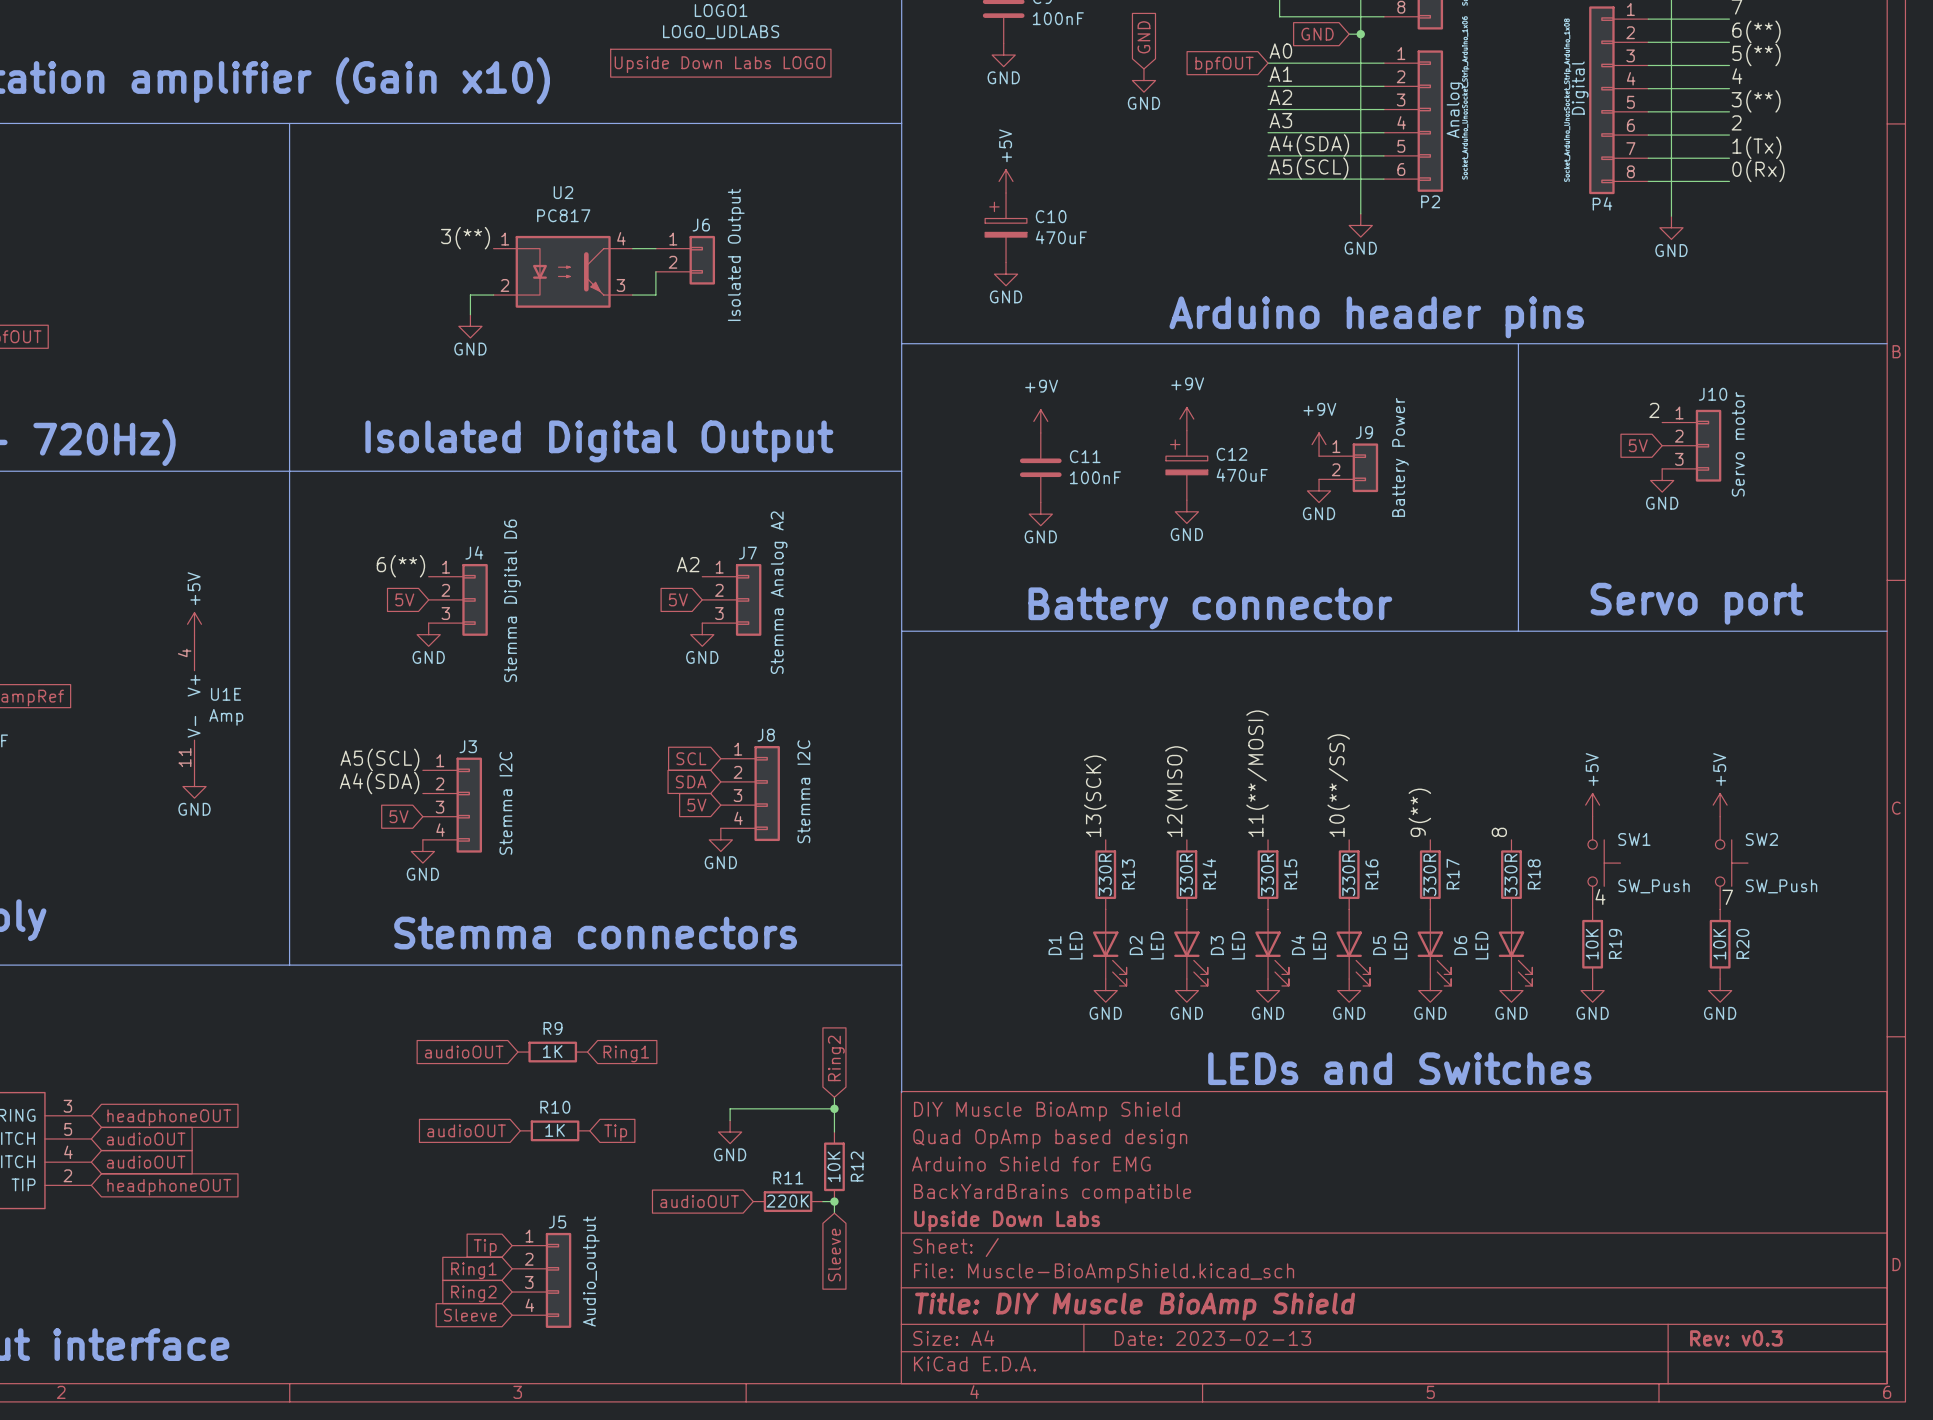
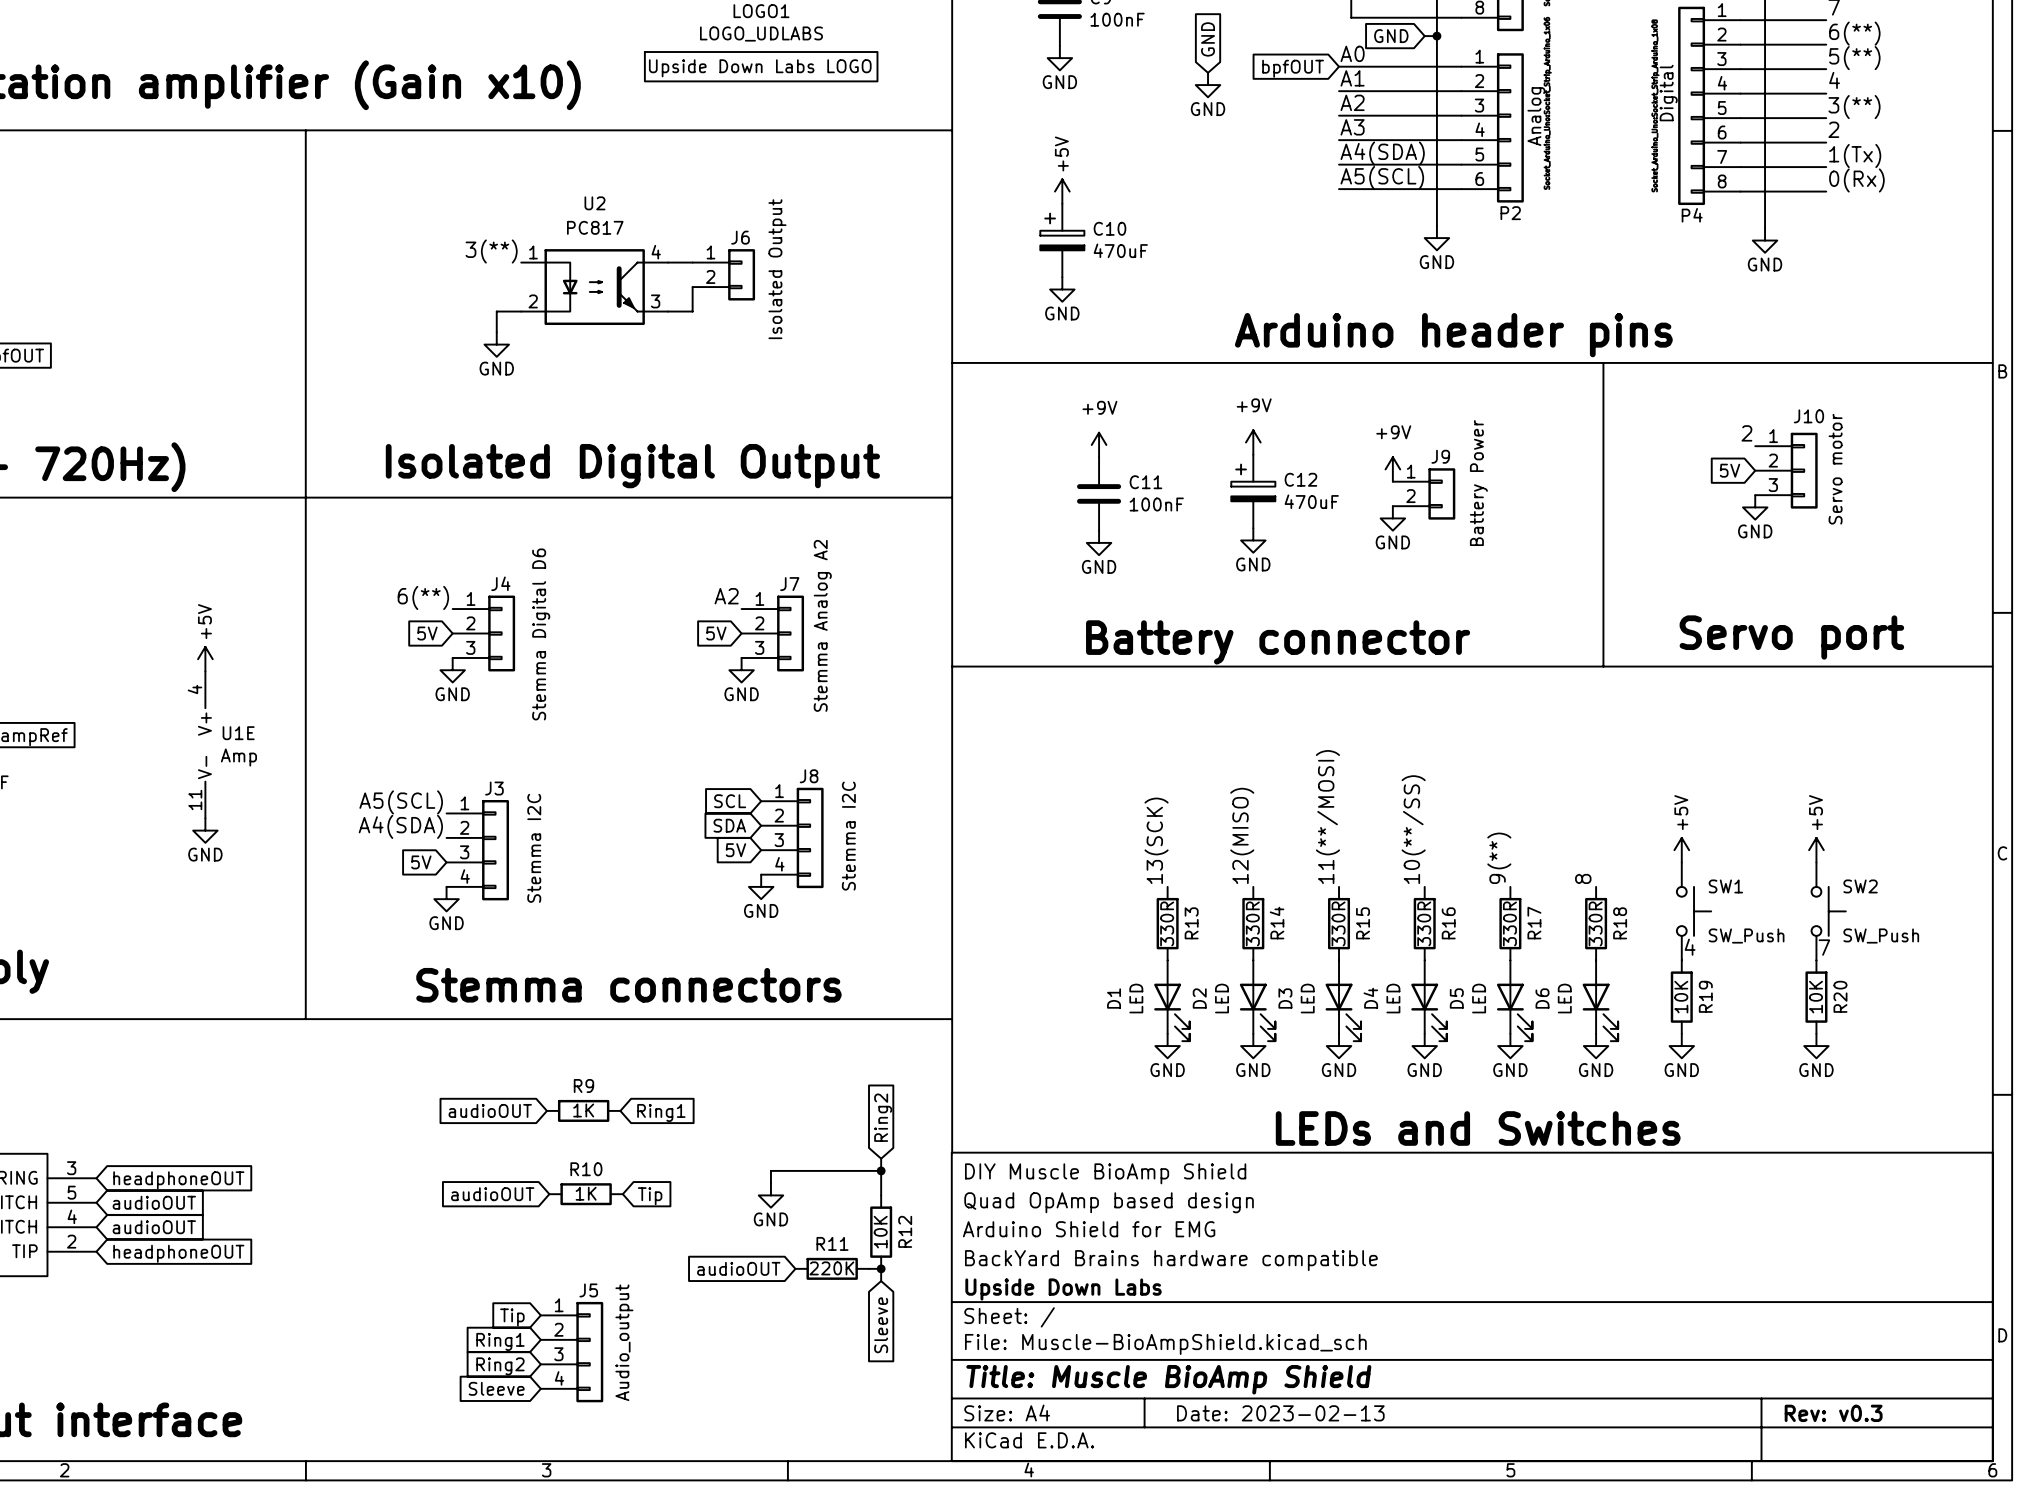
title block: BackYardBrains compatible (1052, 1193) -> BackYard Brains hardware compatible (1171, 1260)
title block: Title: DIY Muscle BioAmp Shield (1135, 1306) -> Title: Muscle BioAmp Shield (1168, 1379)

